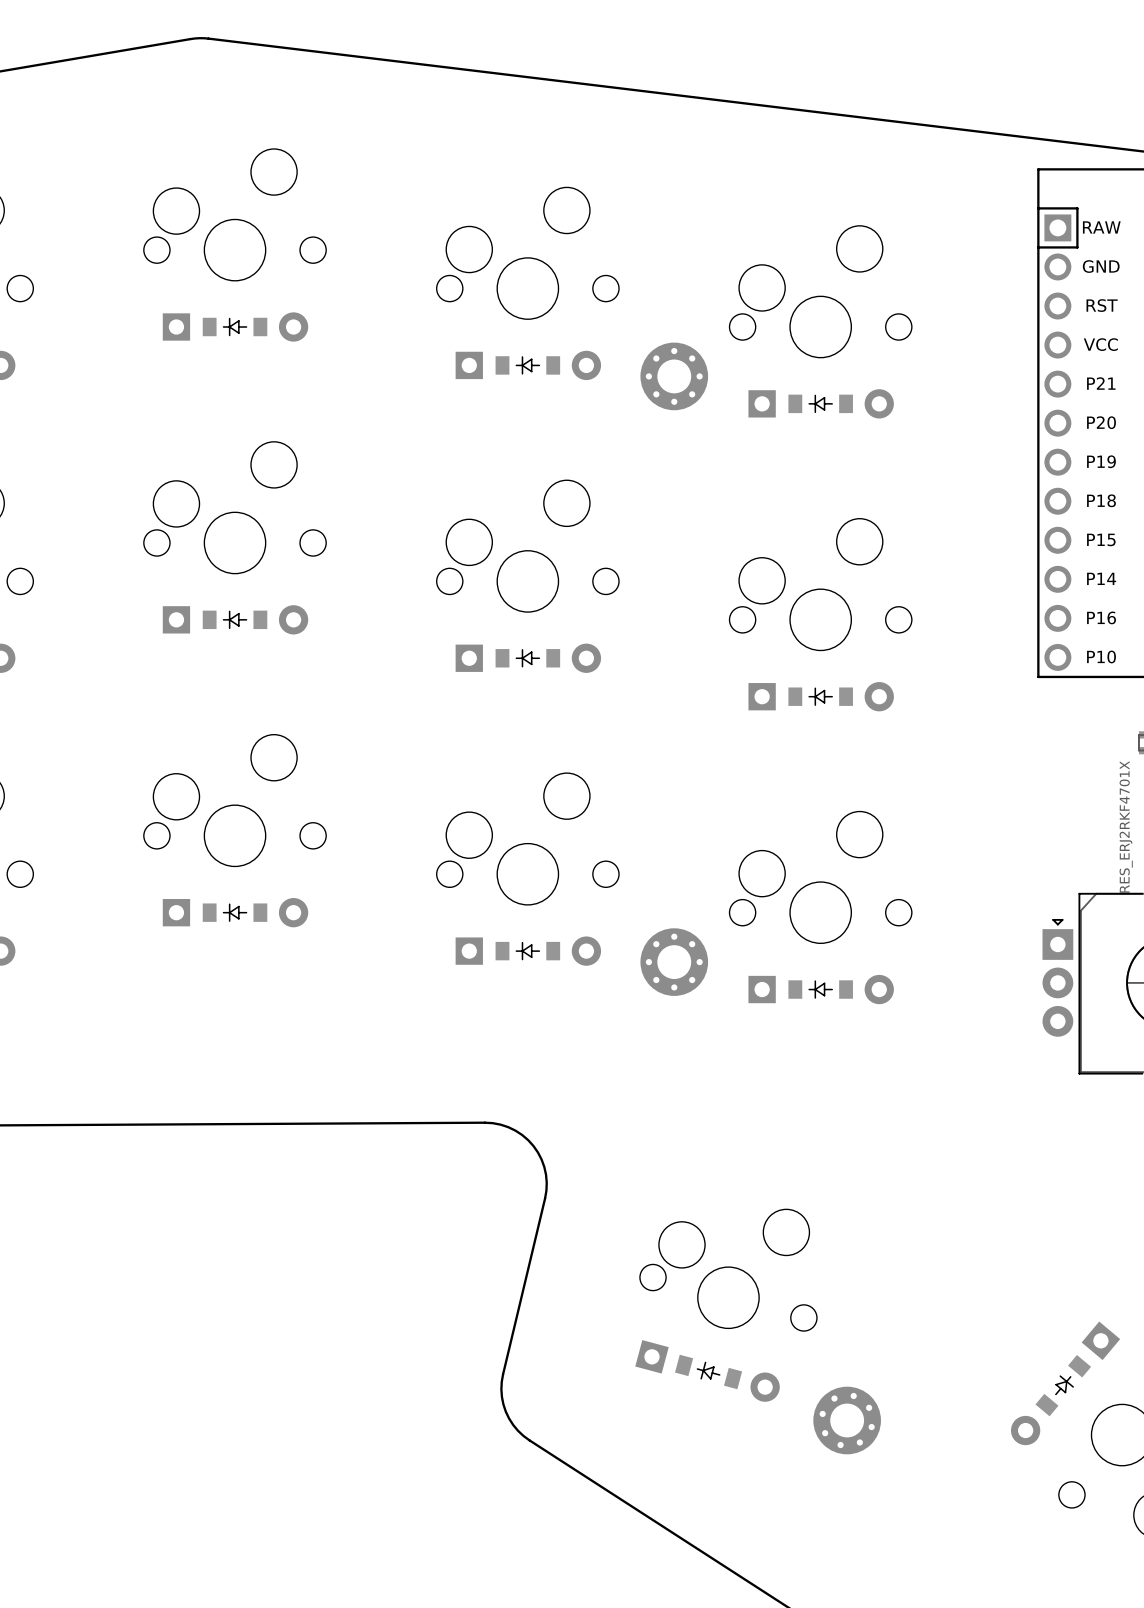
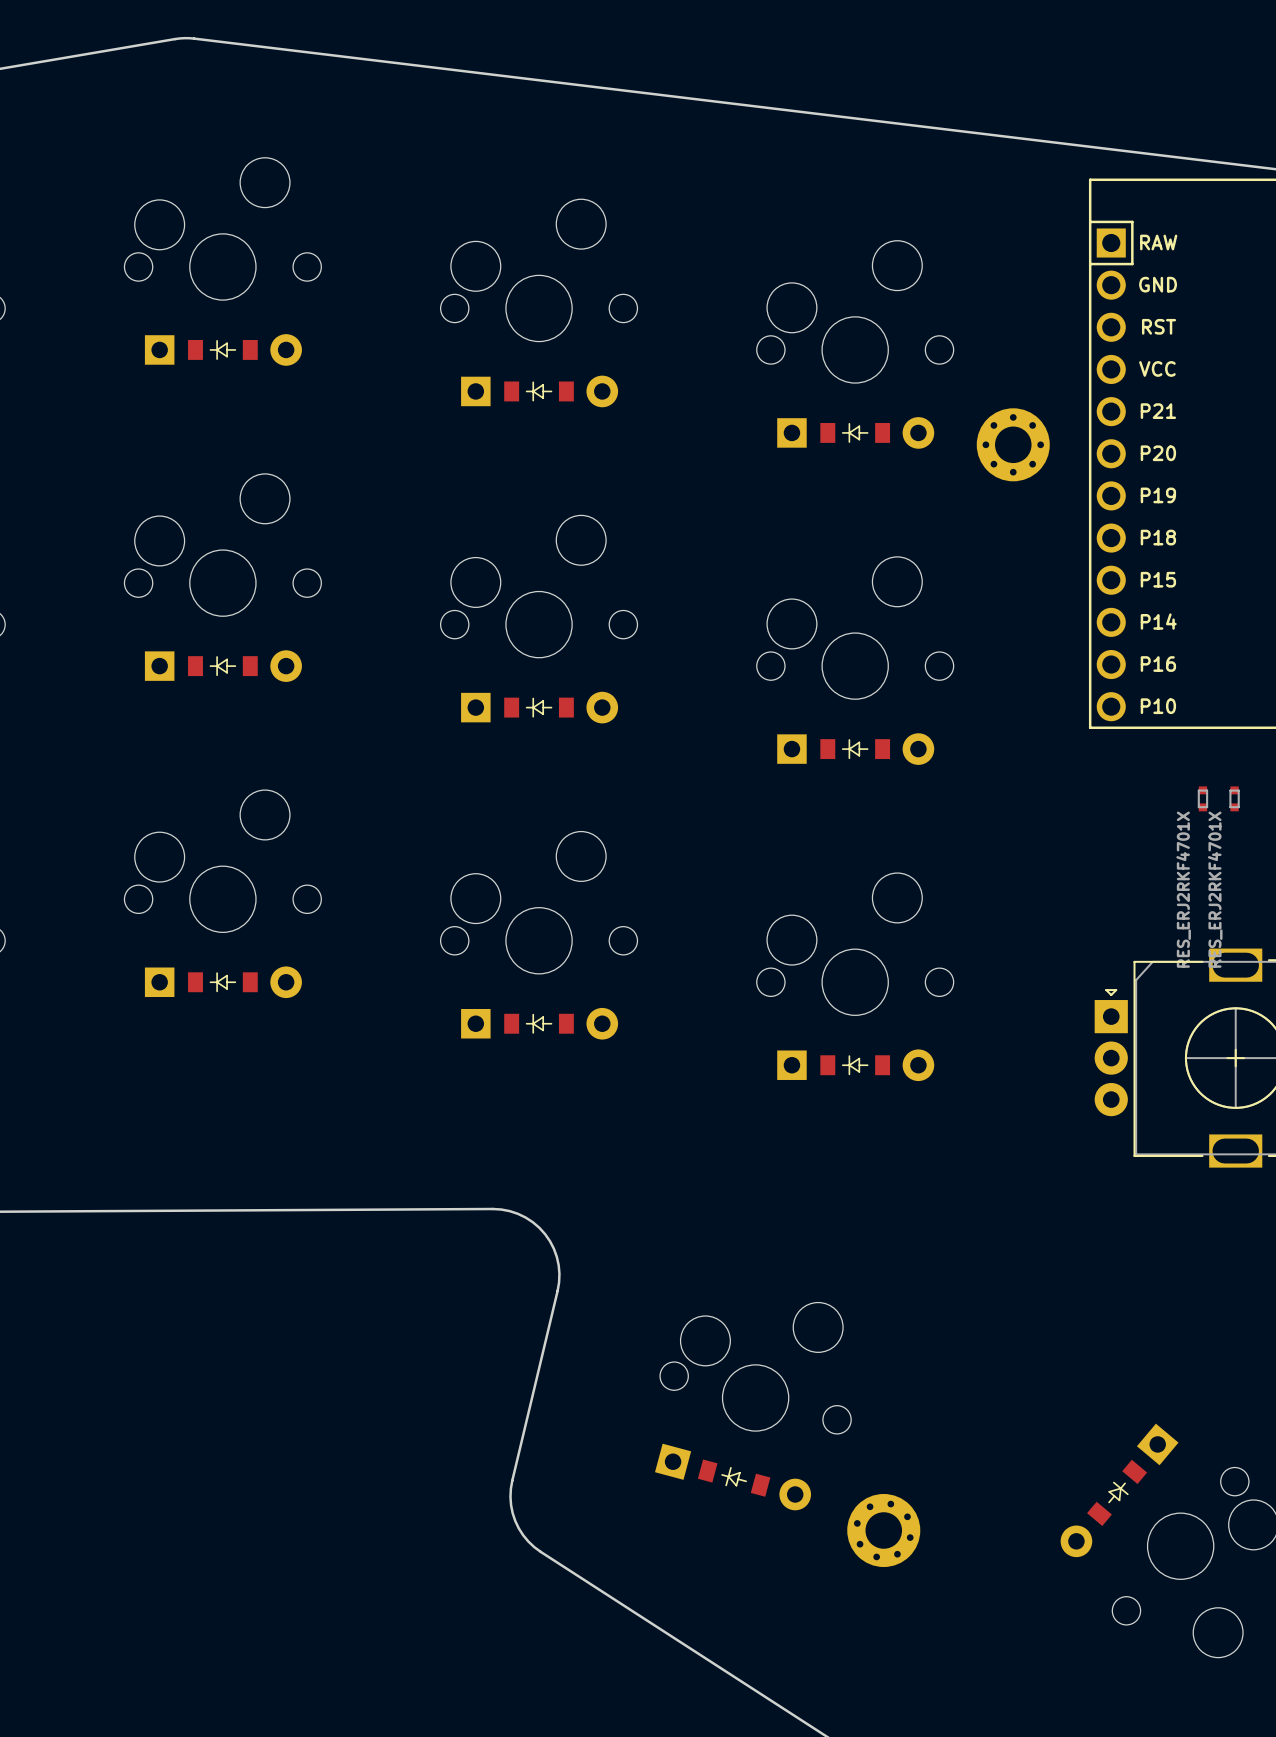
part position: (674, 376) -> (1013, 444)
part: (674, 962) -> none

